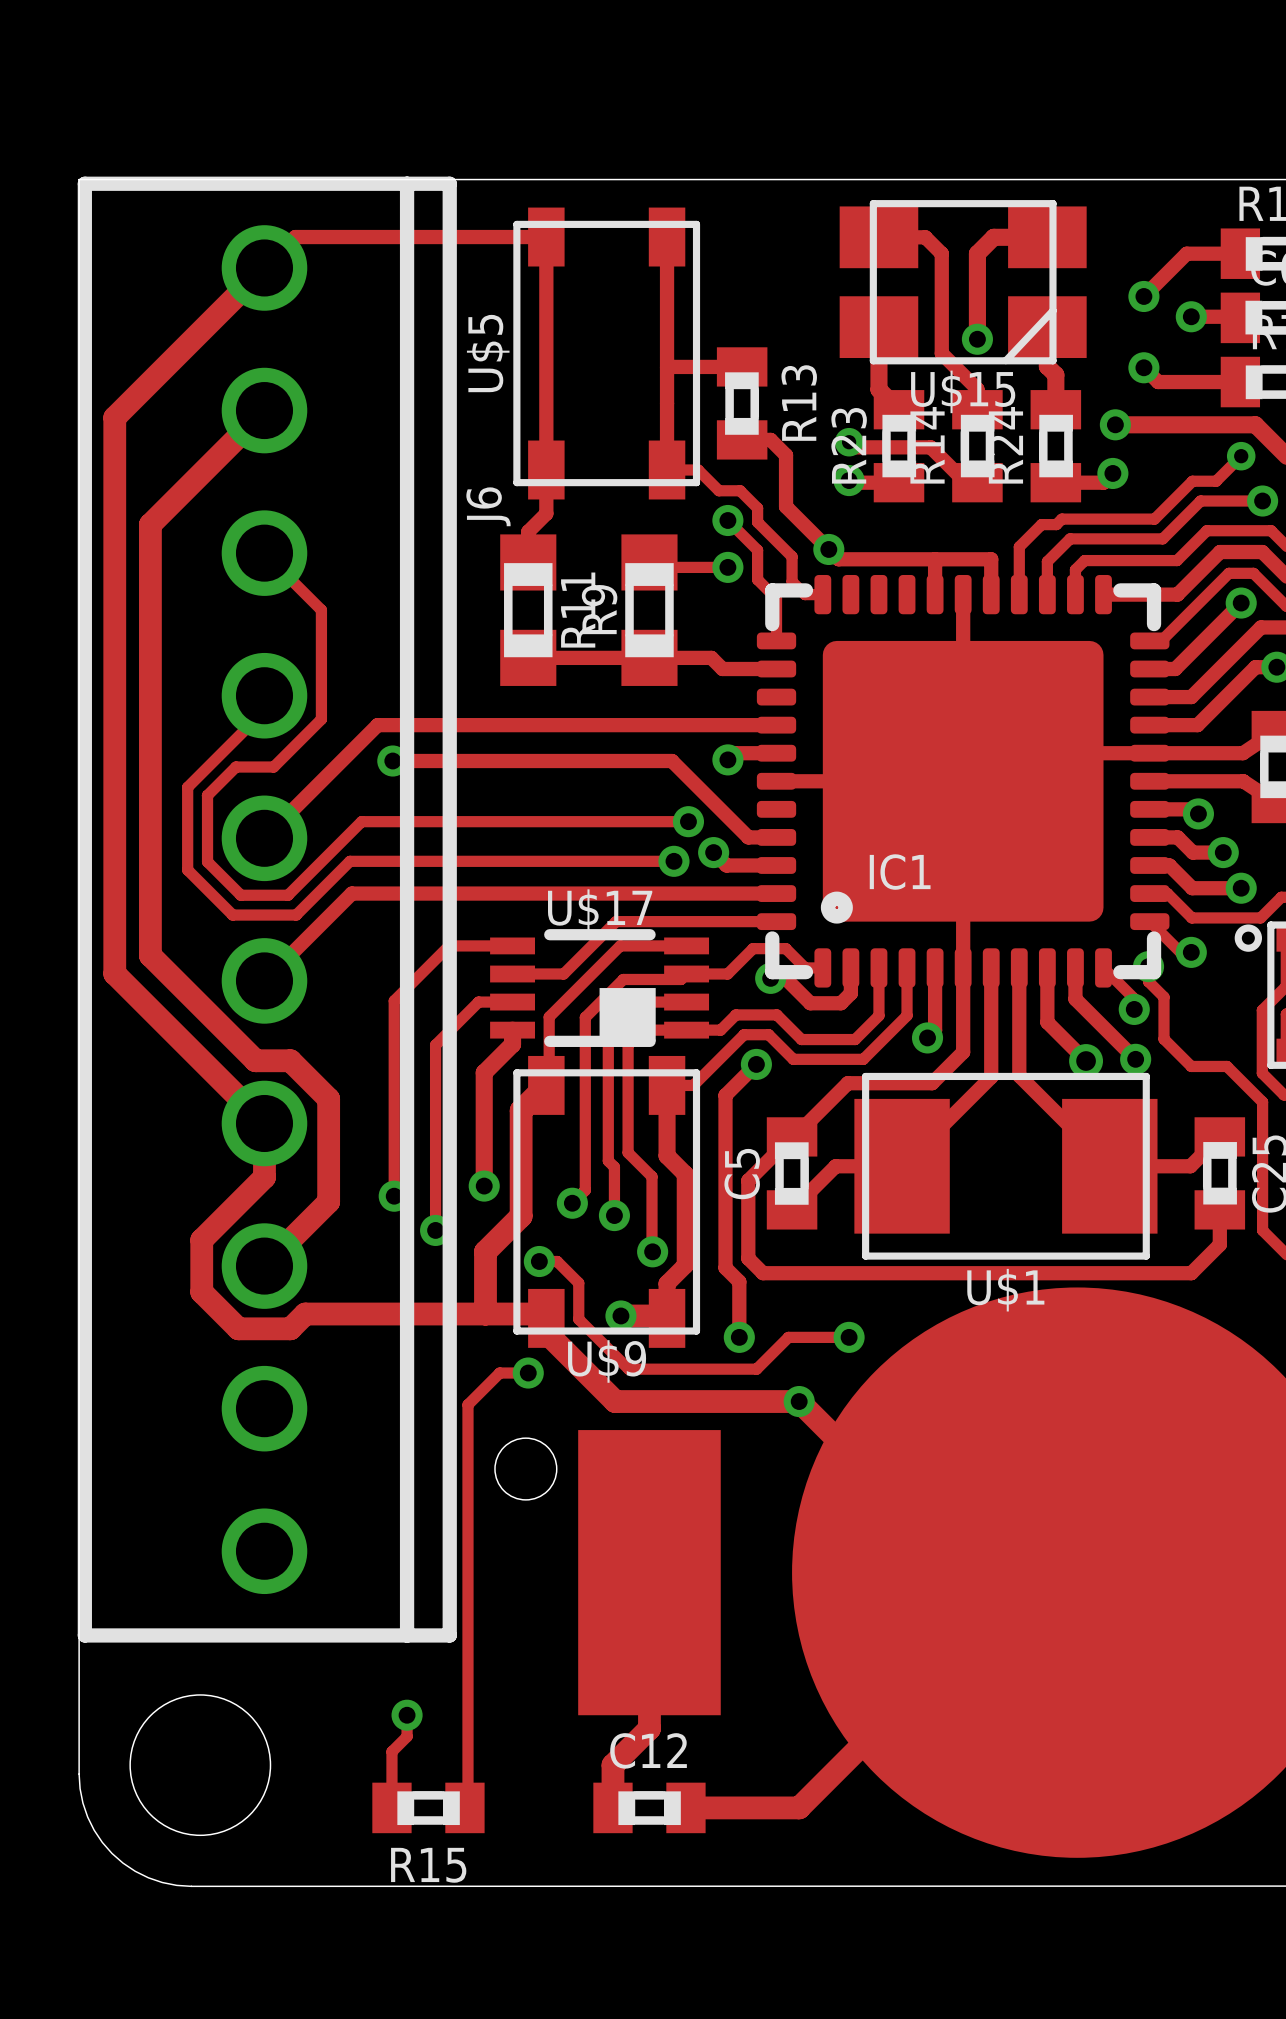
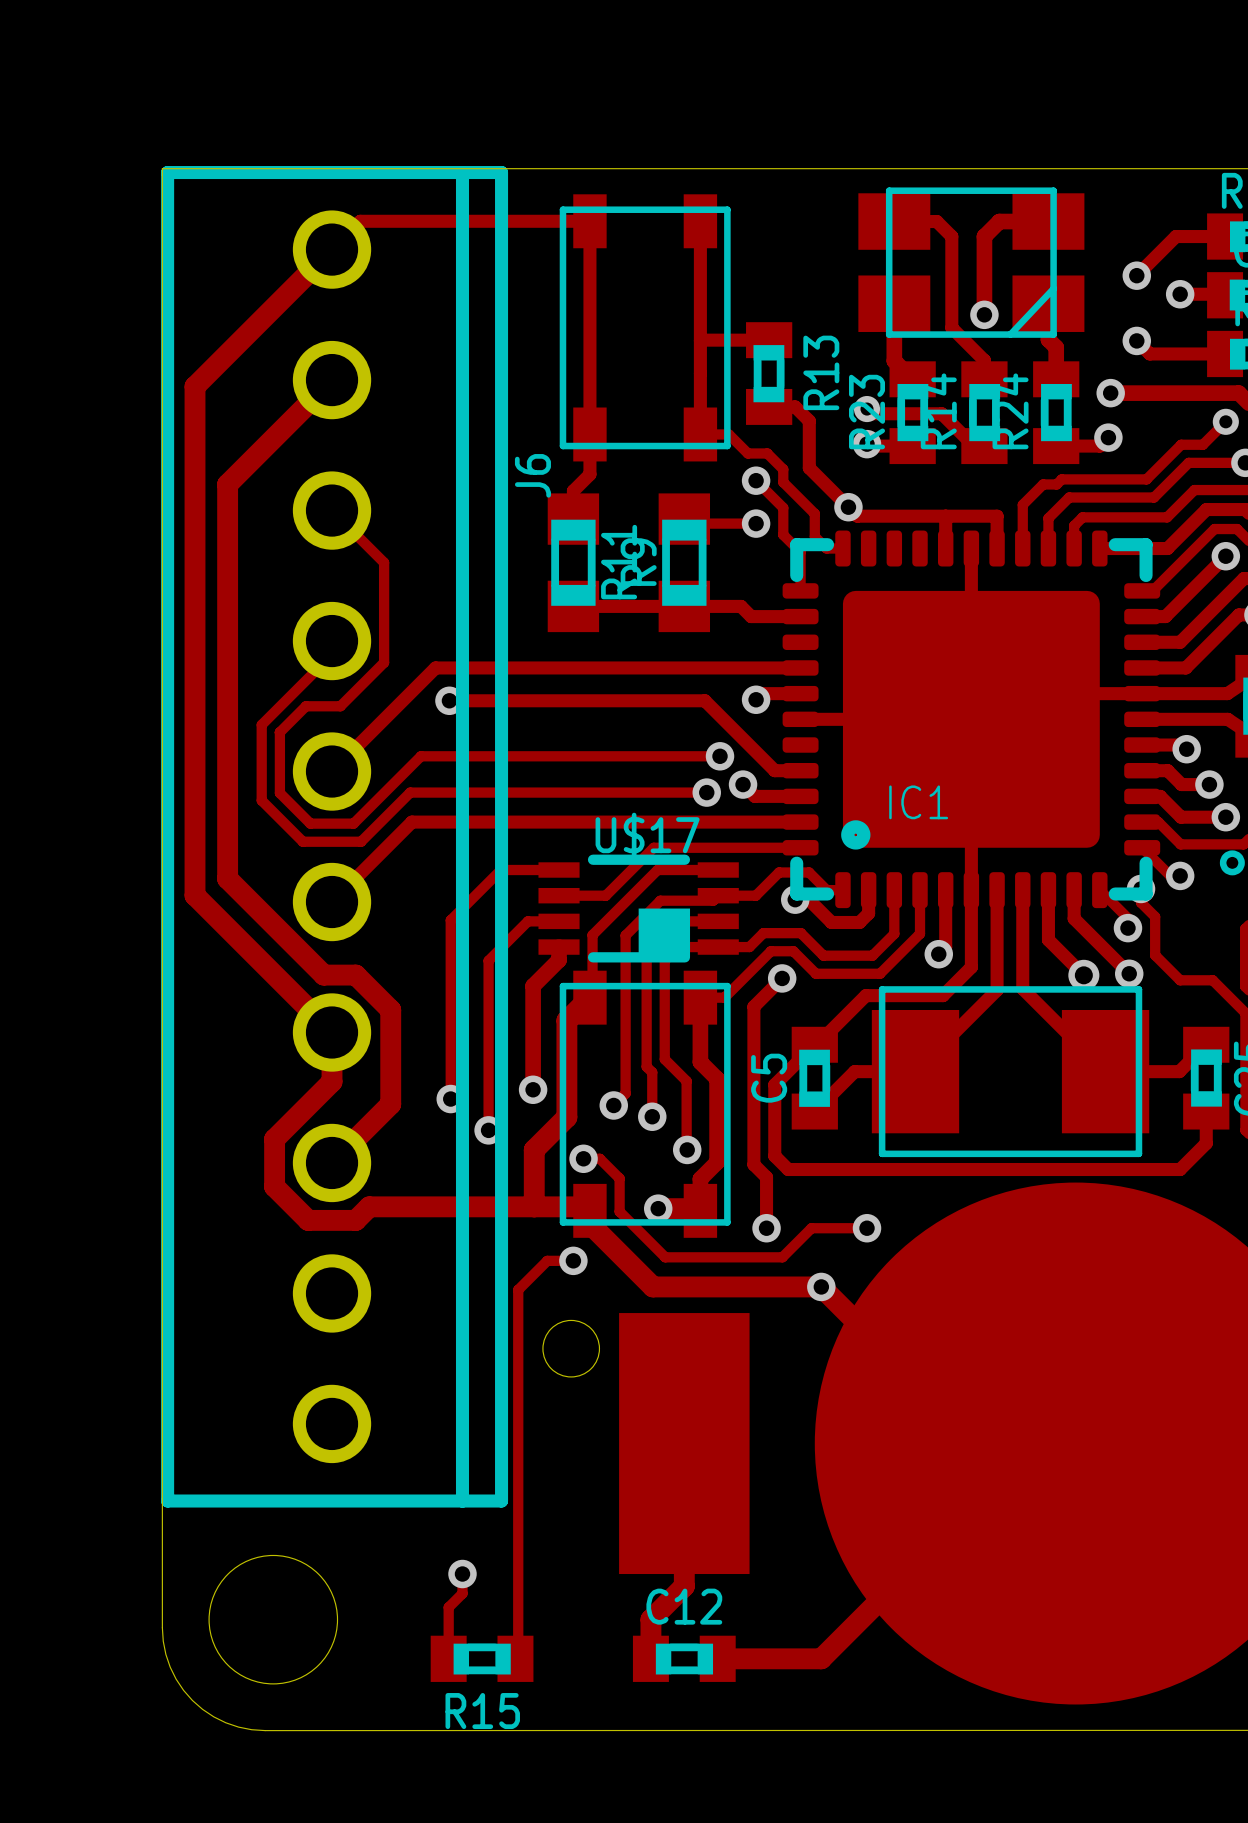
U$5 name: U$5 (488, 353) -> none
U$15 name: U$15 (963, 391) -> none
U$1 name: U$1 (1005, 1290) -> none
U$9 name: U$9 (607, 1361) -> none

